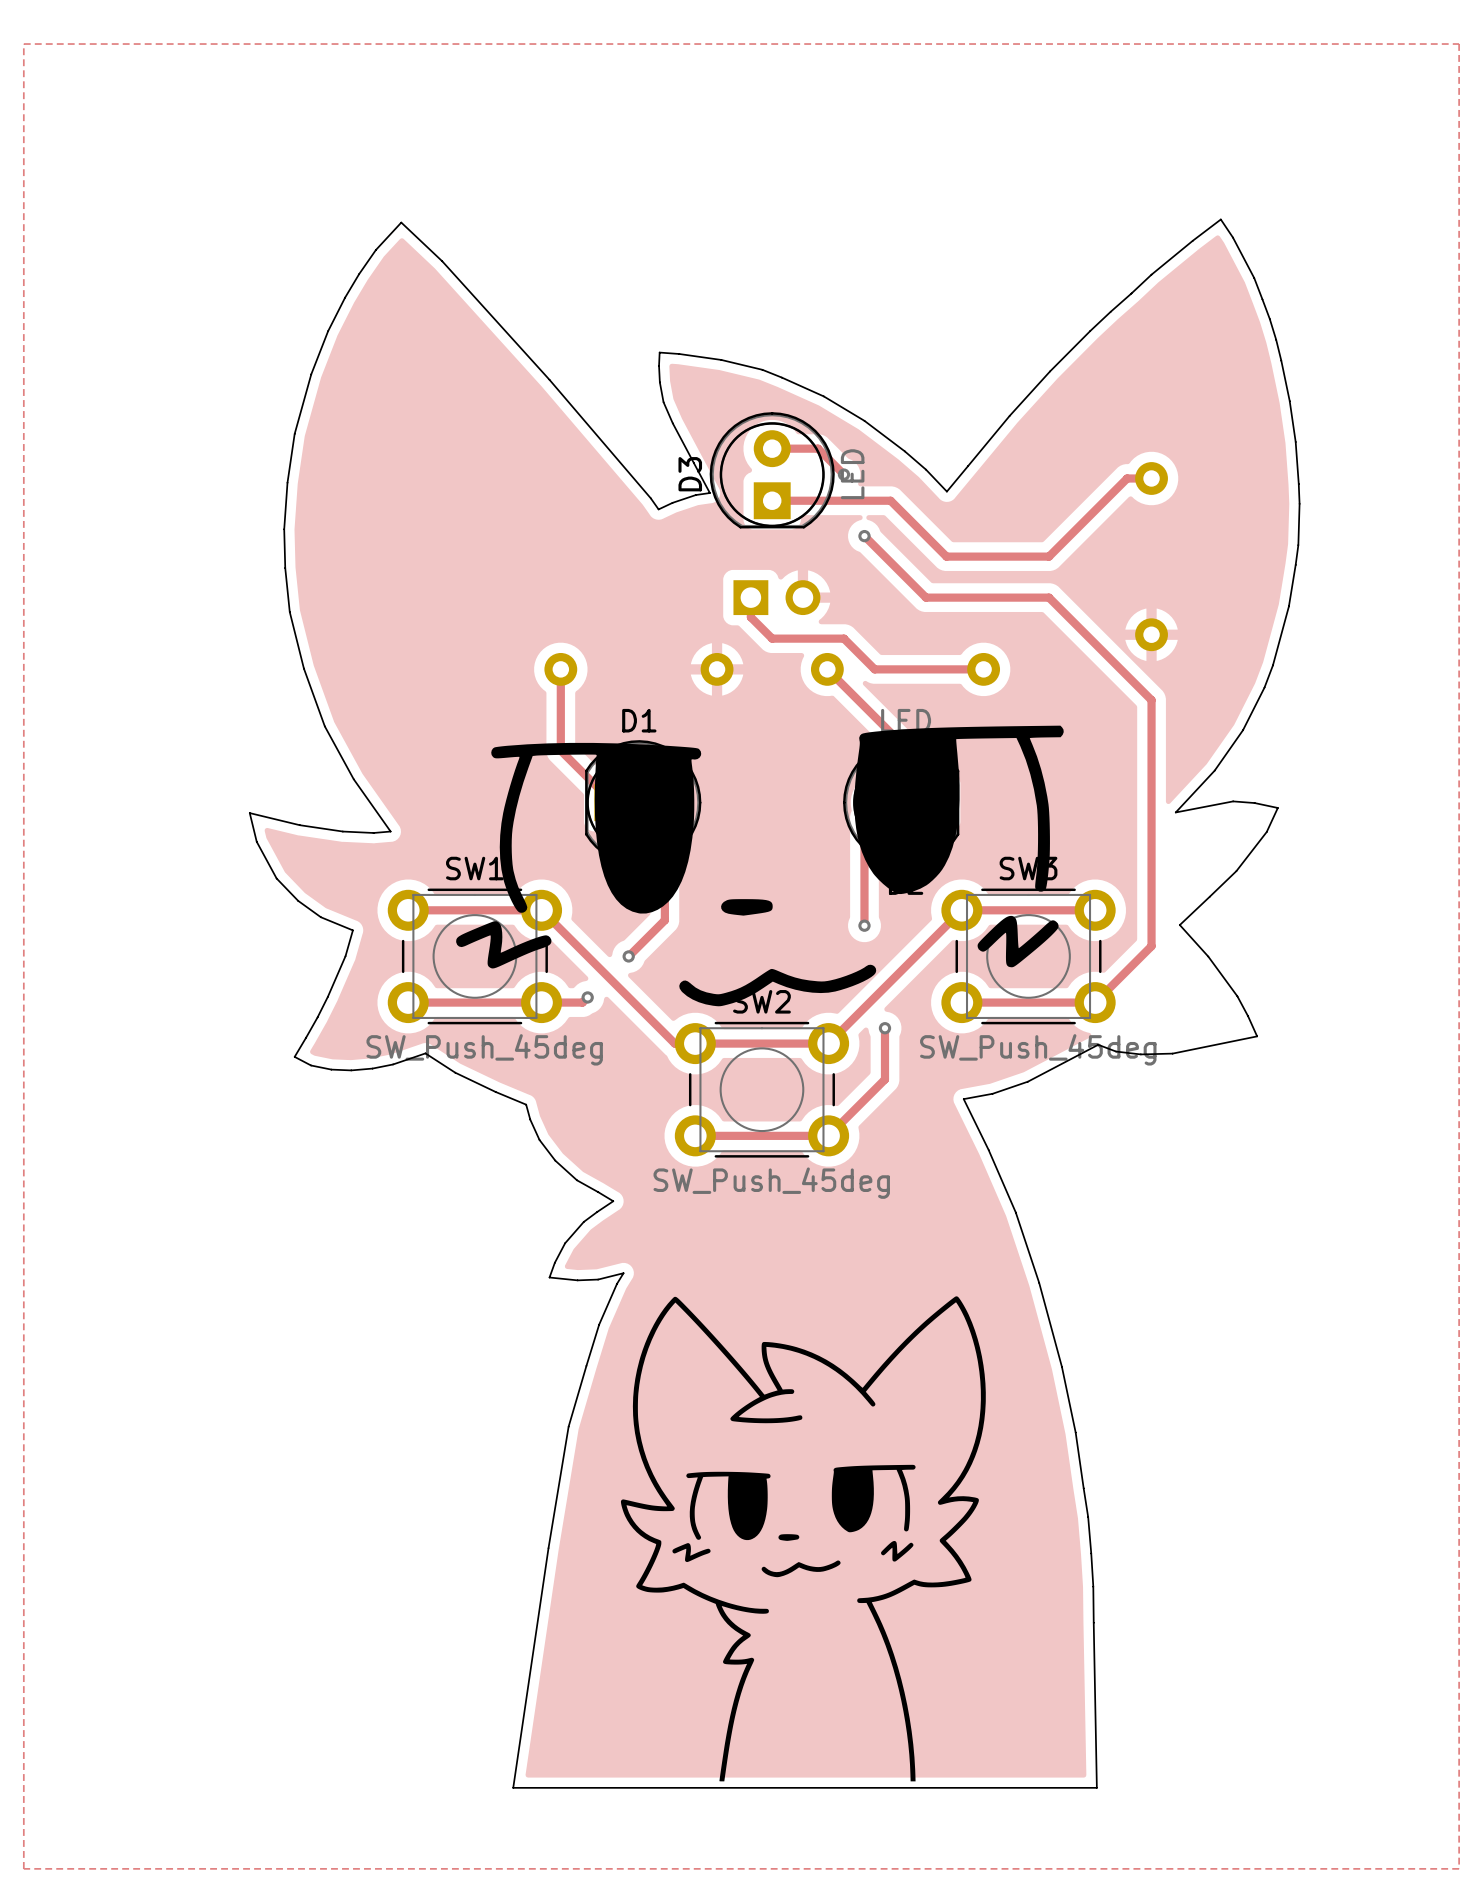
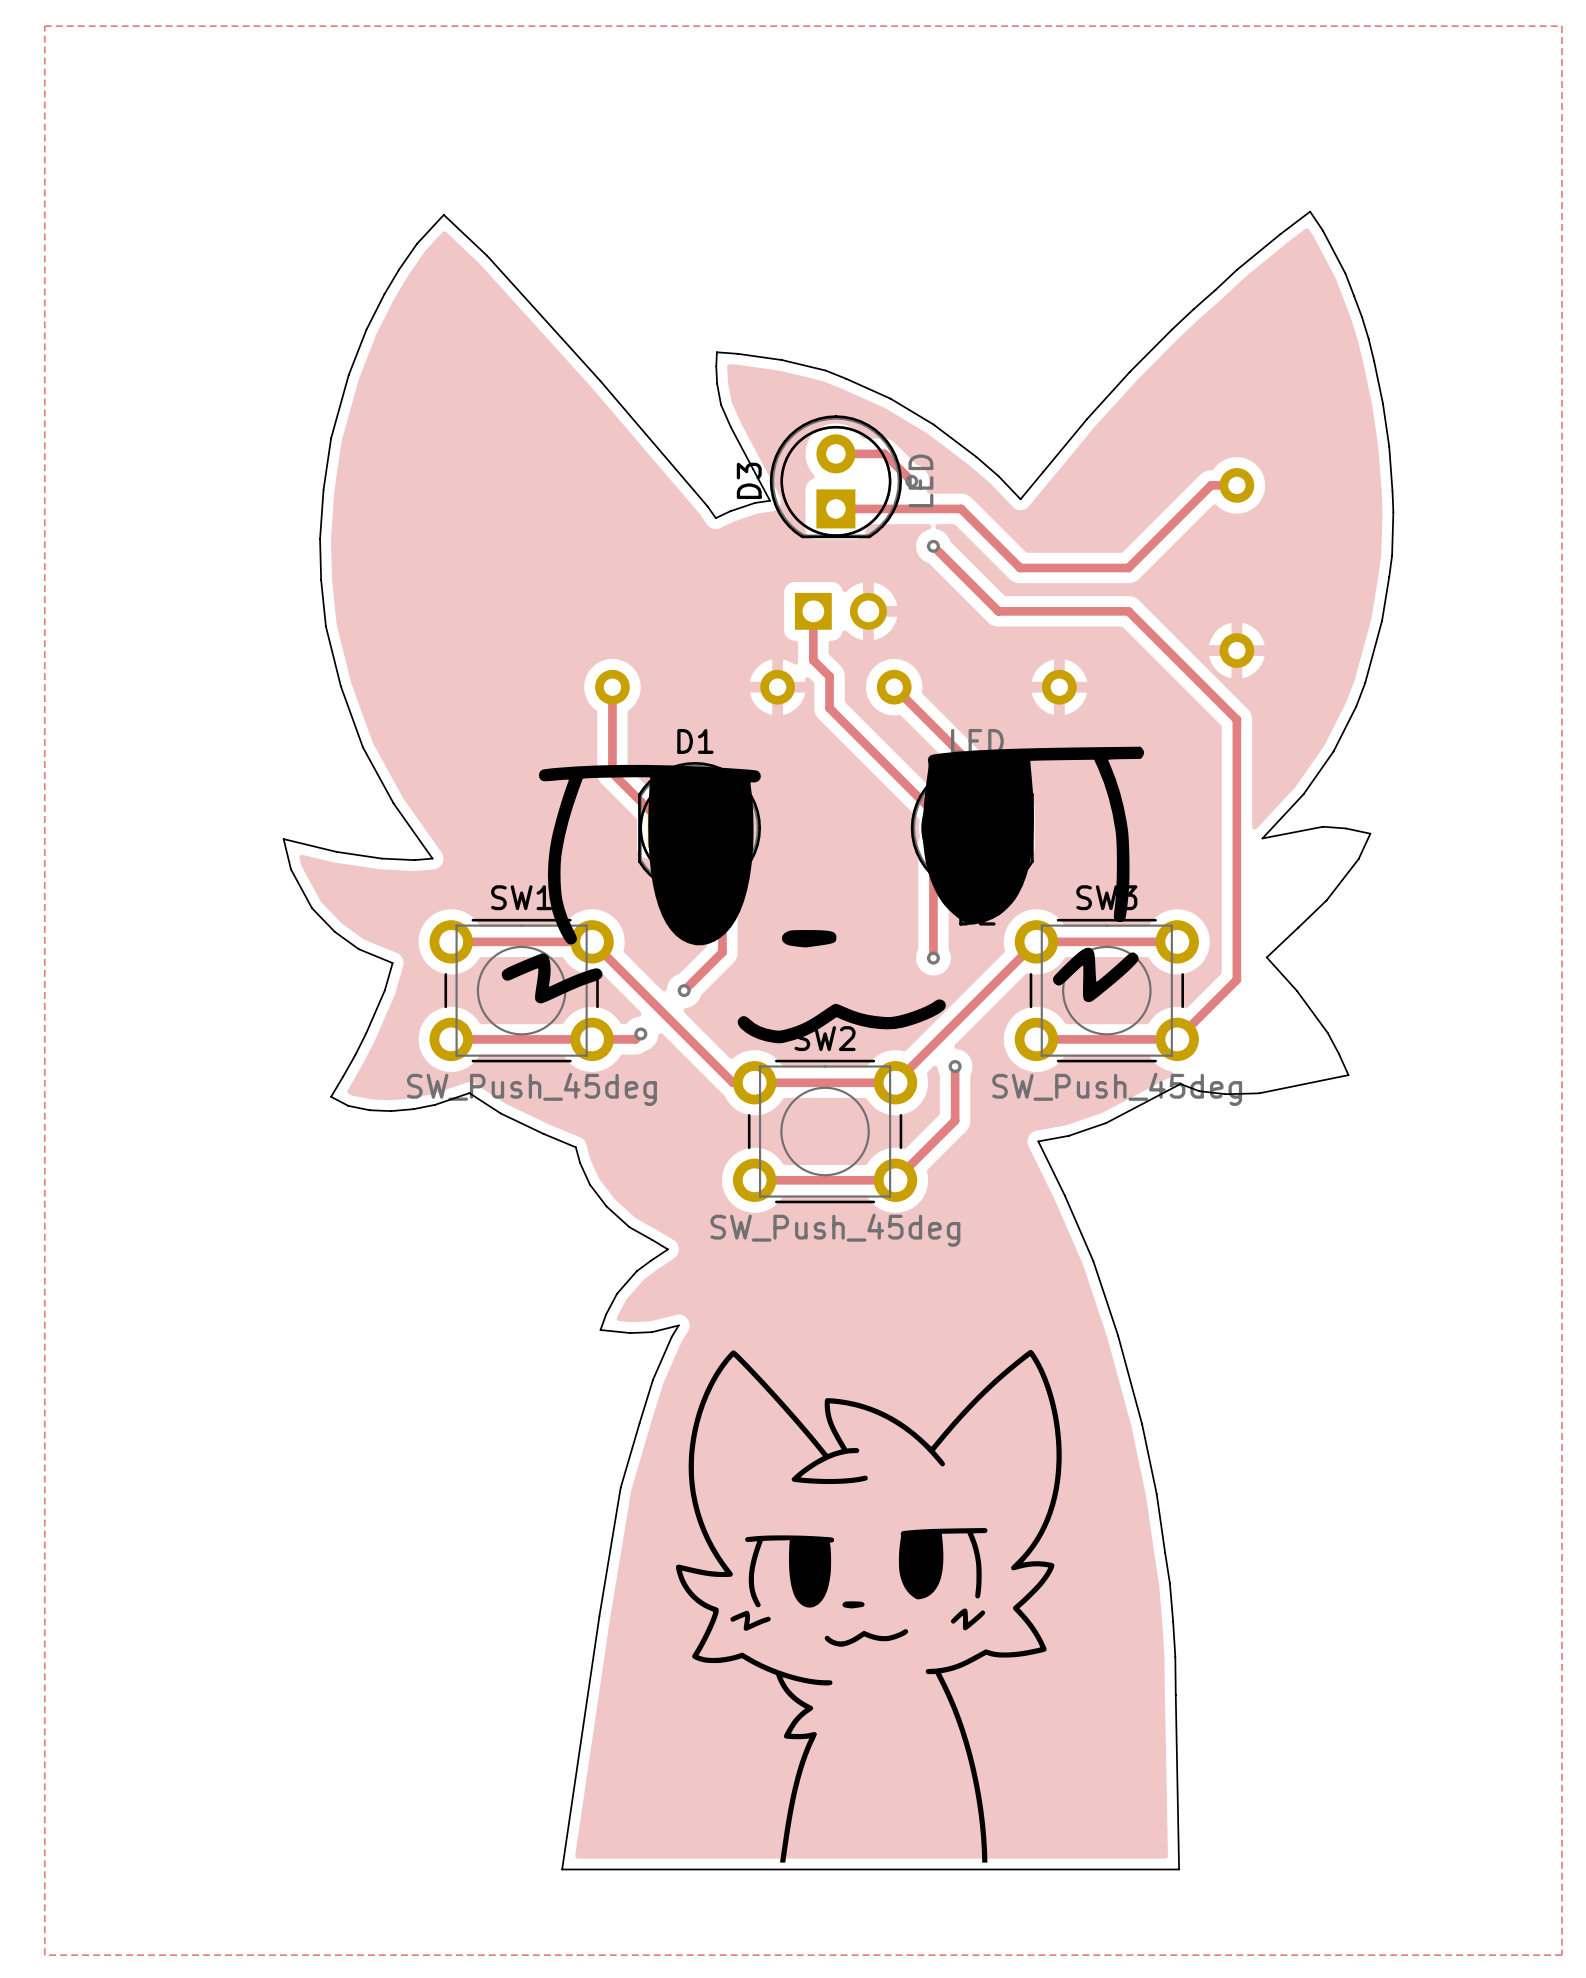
track: (750, 617) (772, 638) (843, 638) (874, 669) (983, 669) -> (813, 632) (813, 660) (829, 676) (829, 708) (949, 828)

